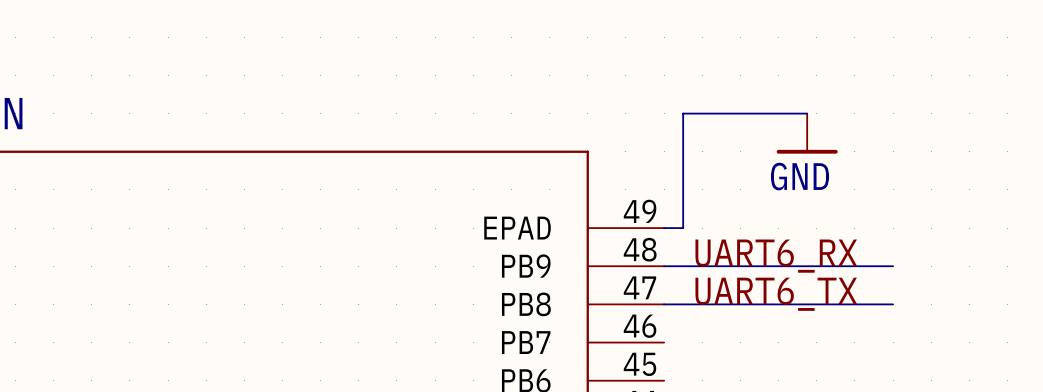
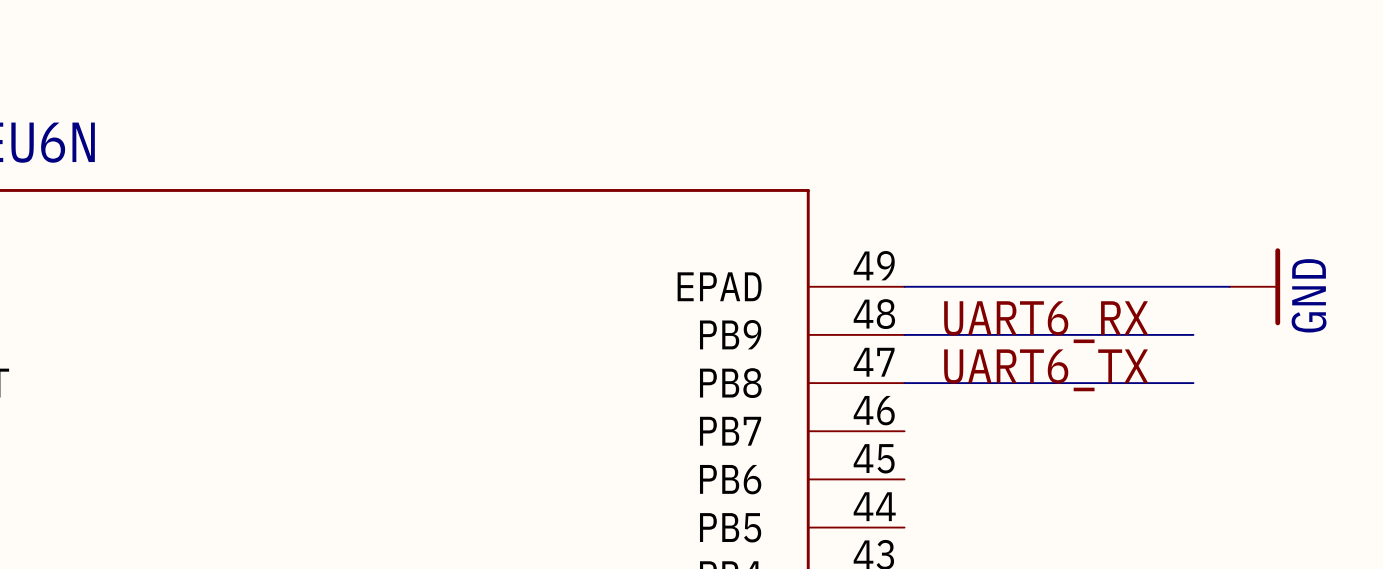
wire: (807, 113) (683, 113) (683, 228) -> (1229, 286) (928, 286)
power symbol position: GND (807, 133) -> GND (1254, 286)
power symbol rotation: 0° (807, 151) -> 90° counterclockwise (1277, 286)

